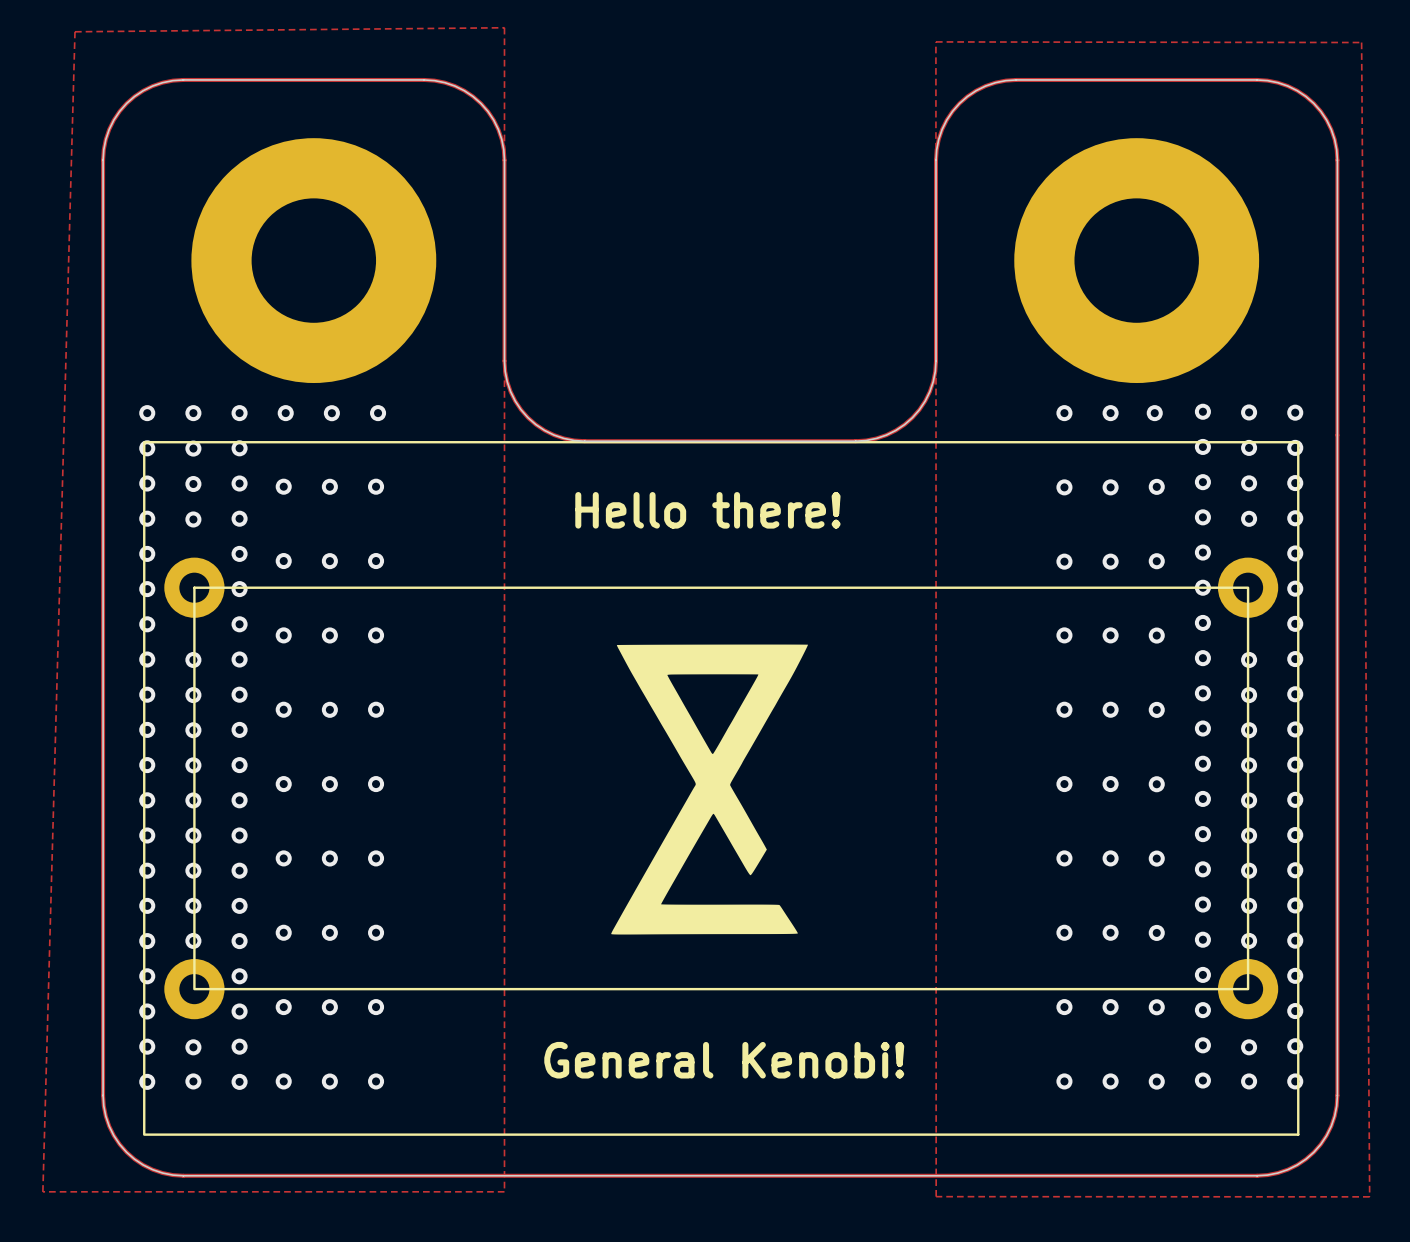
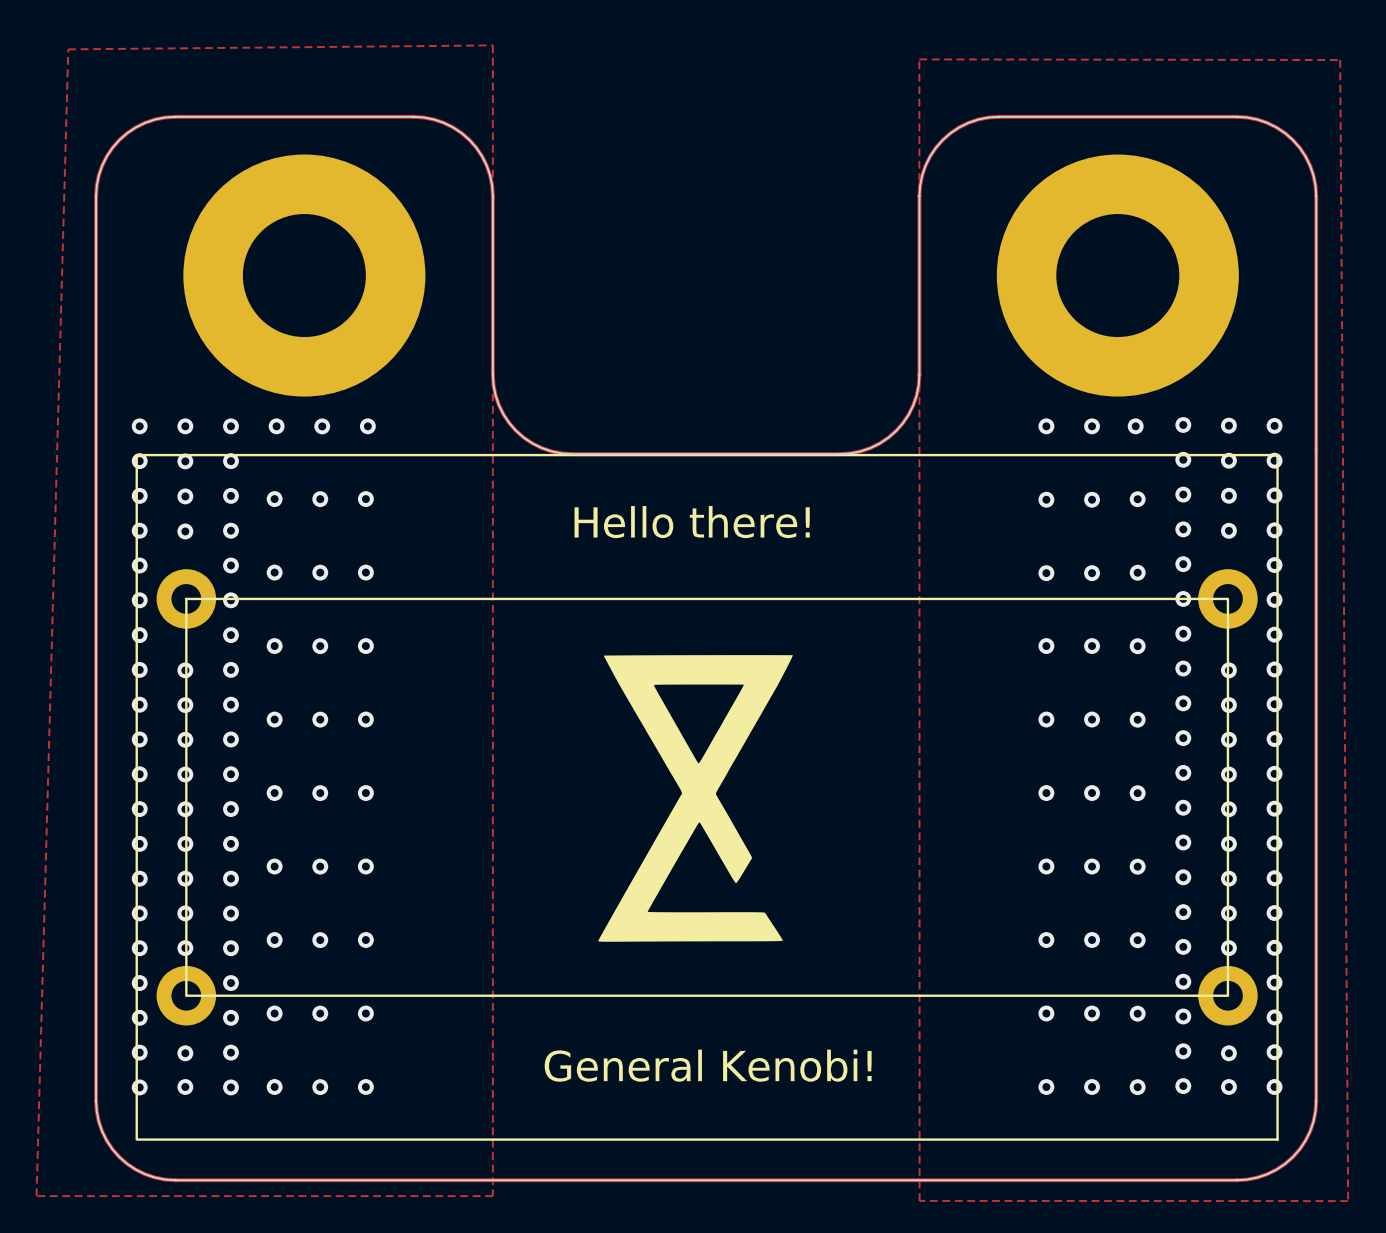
track: (103, 180) (105, 139) (119, 111) (134, 96) (152, 86) (183, 79) (424, 79) (444, 82) (473, 96) (493, 120) (503, 149) (504, 180) -> (96, 196) (102, 165) (119, 140) (145, 122) (175, 116) (413, 116) (434, 119) (453, 127) (476, 147) (486, 165) (492, 196)
board edge: (103, 180) (105, 139) (119, 111) (134, 96) (152, 86) (183, 79) (424, 79) (444, 82) (473, 96) (493, 120) (503, 149) (504, 180) -> (96, 196) (102, 165) (119, 140) (145, 122) (175, 116) (413, 116) (434, 119) (453, 127) (476, 147) (486, 165) (492, 196)
track: (935, 180) (938, 139) (952, 111) (967, 96) (985, 86) (1016, 79) (1257, 79) (1277, 82) (1305, 96) (1326, 120) (1336, 149) (1337, 180) -> (919, 196) (925, 165) (942, 140) (968, 122) (998, 116) (1236, 116) (1257, 119) (1276, 127) (1299, 147) (1310, 165) (1316, 196)
board edge: (935, 180) (938, 139) (952, 111) (967, 96) (985, 86) (1016, 79) (1257, 79) (1277, 82) (1305, 96) (1326, 120) (1336, 149) (1337, 180) -> (919, 196) (925, 165) (942, 140) (968, 122) (998, 116) (1236, 116) (1257, 119) (1276, 127) (1299, 147) (1310, 165) (1316, 196)

